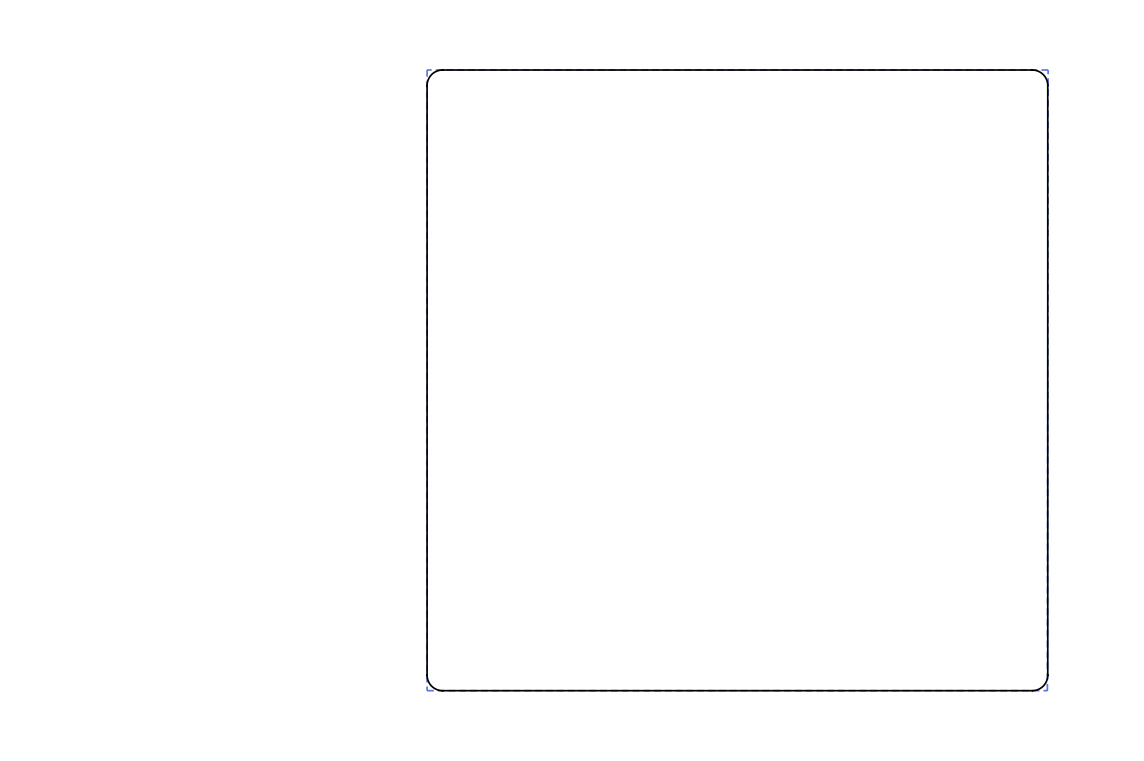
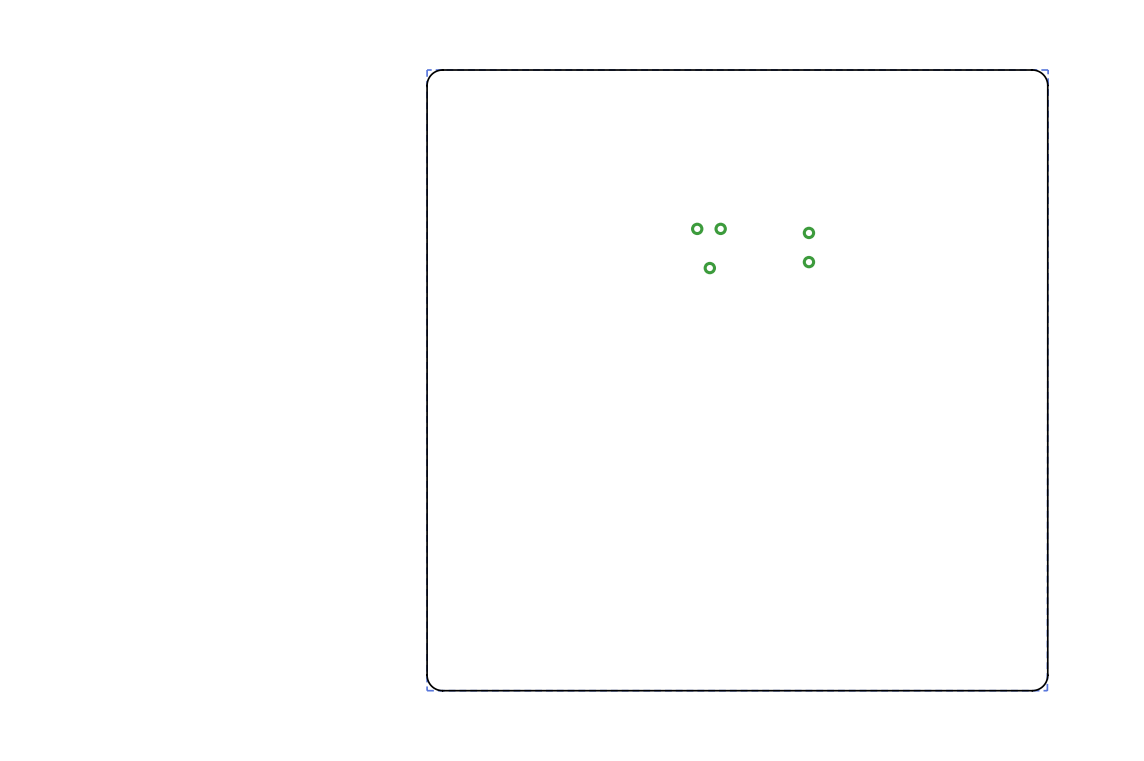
via: none -> (697, 228)
via: none -> (720, 228)
via: none -> (808, 232)
via: none -> (808, 262)
via: none -> (709, 268)

